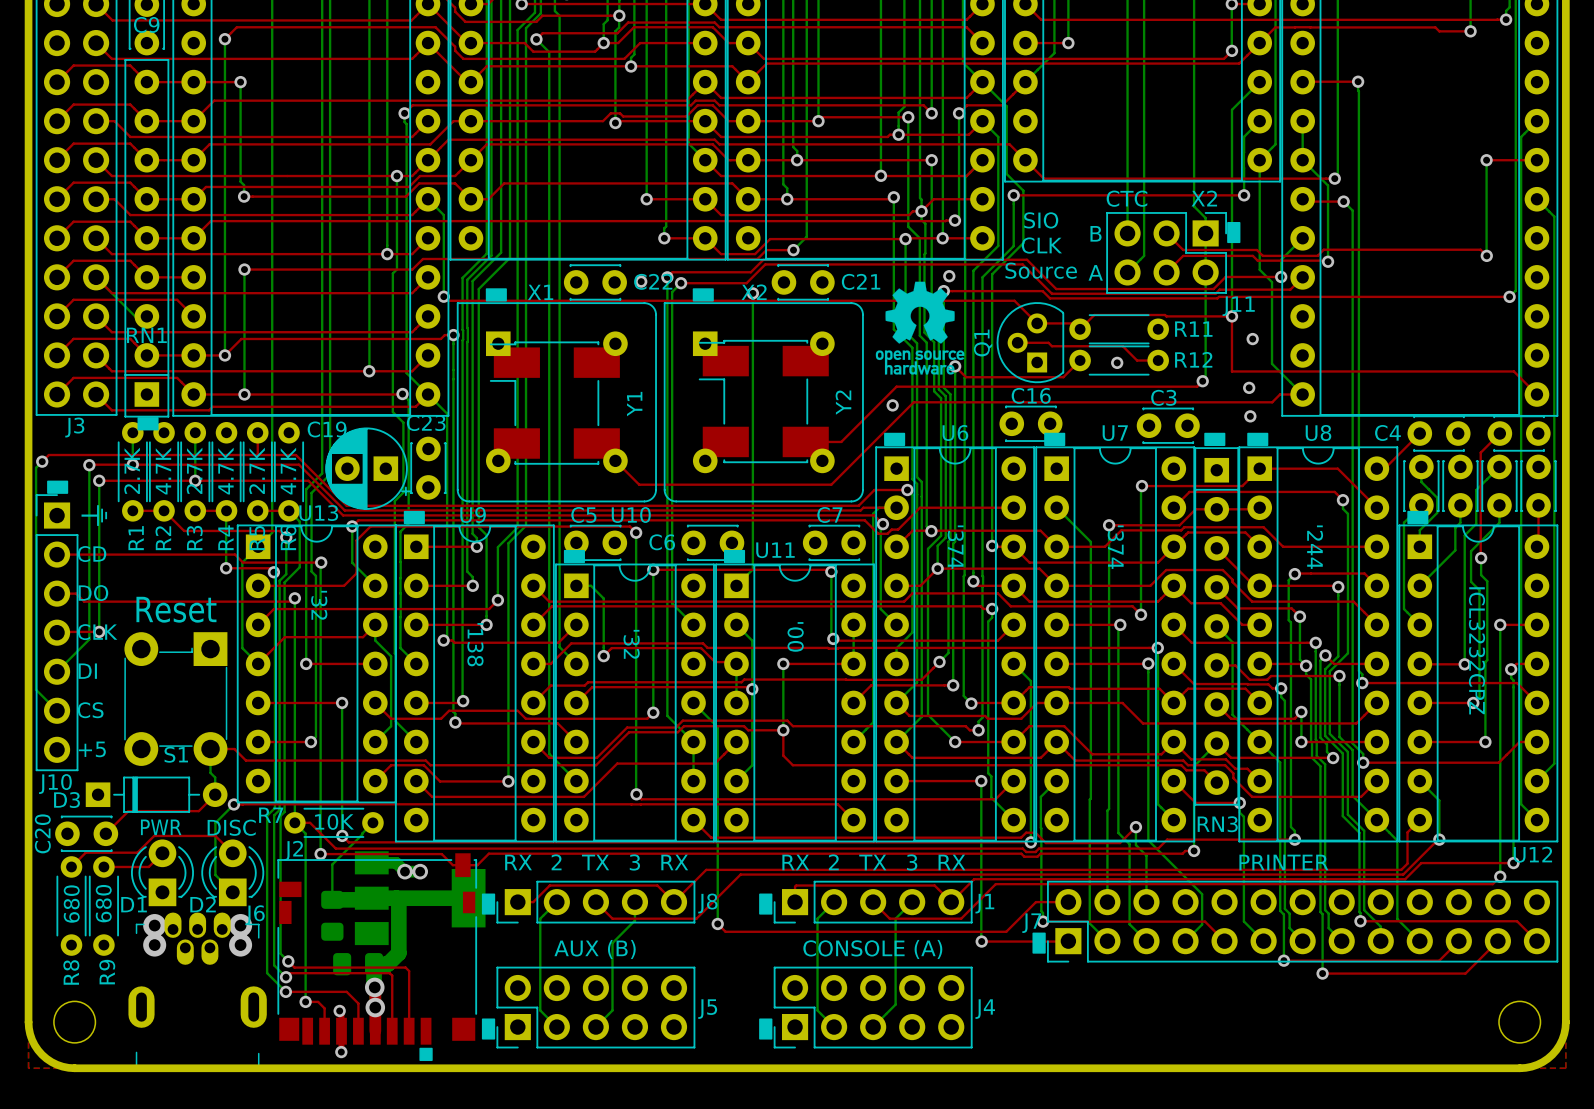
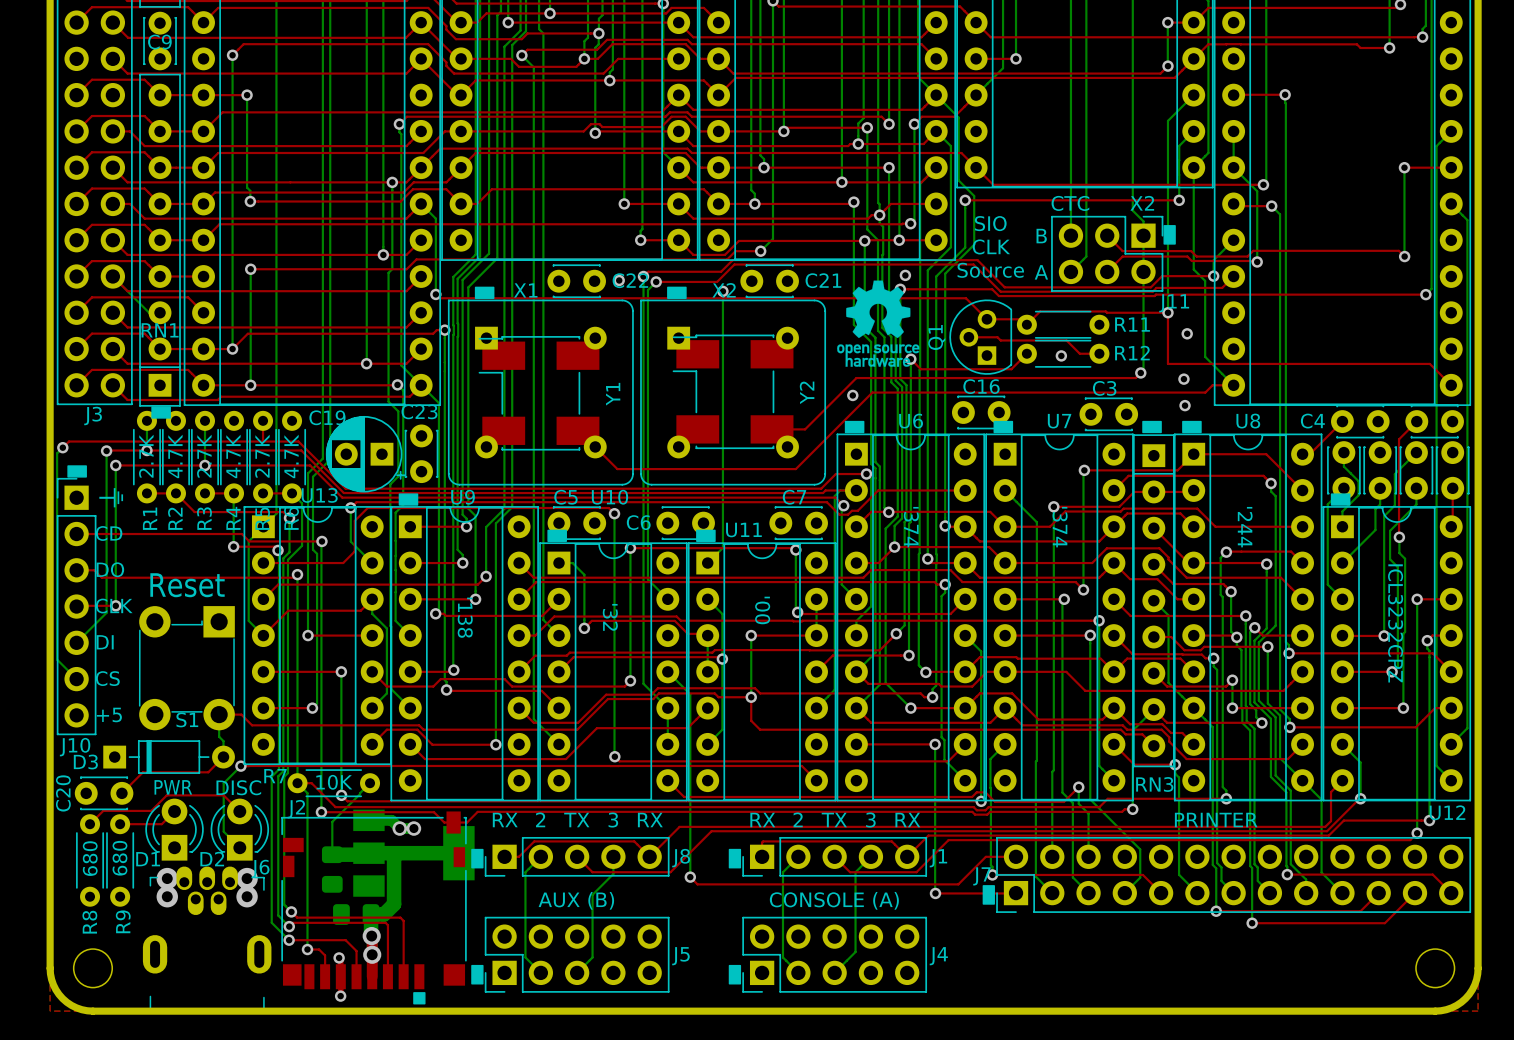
text: '32 (319, 605) -> none

